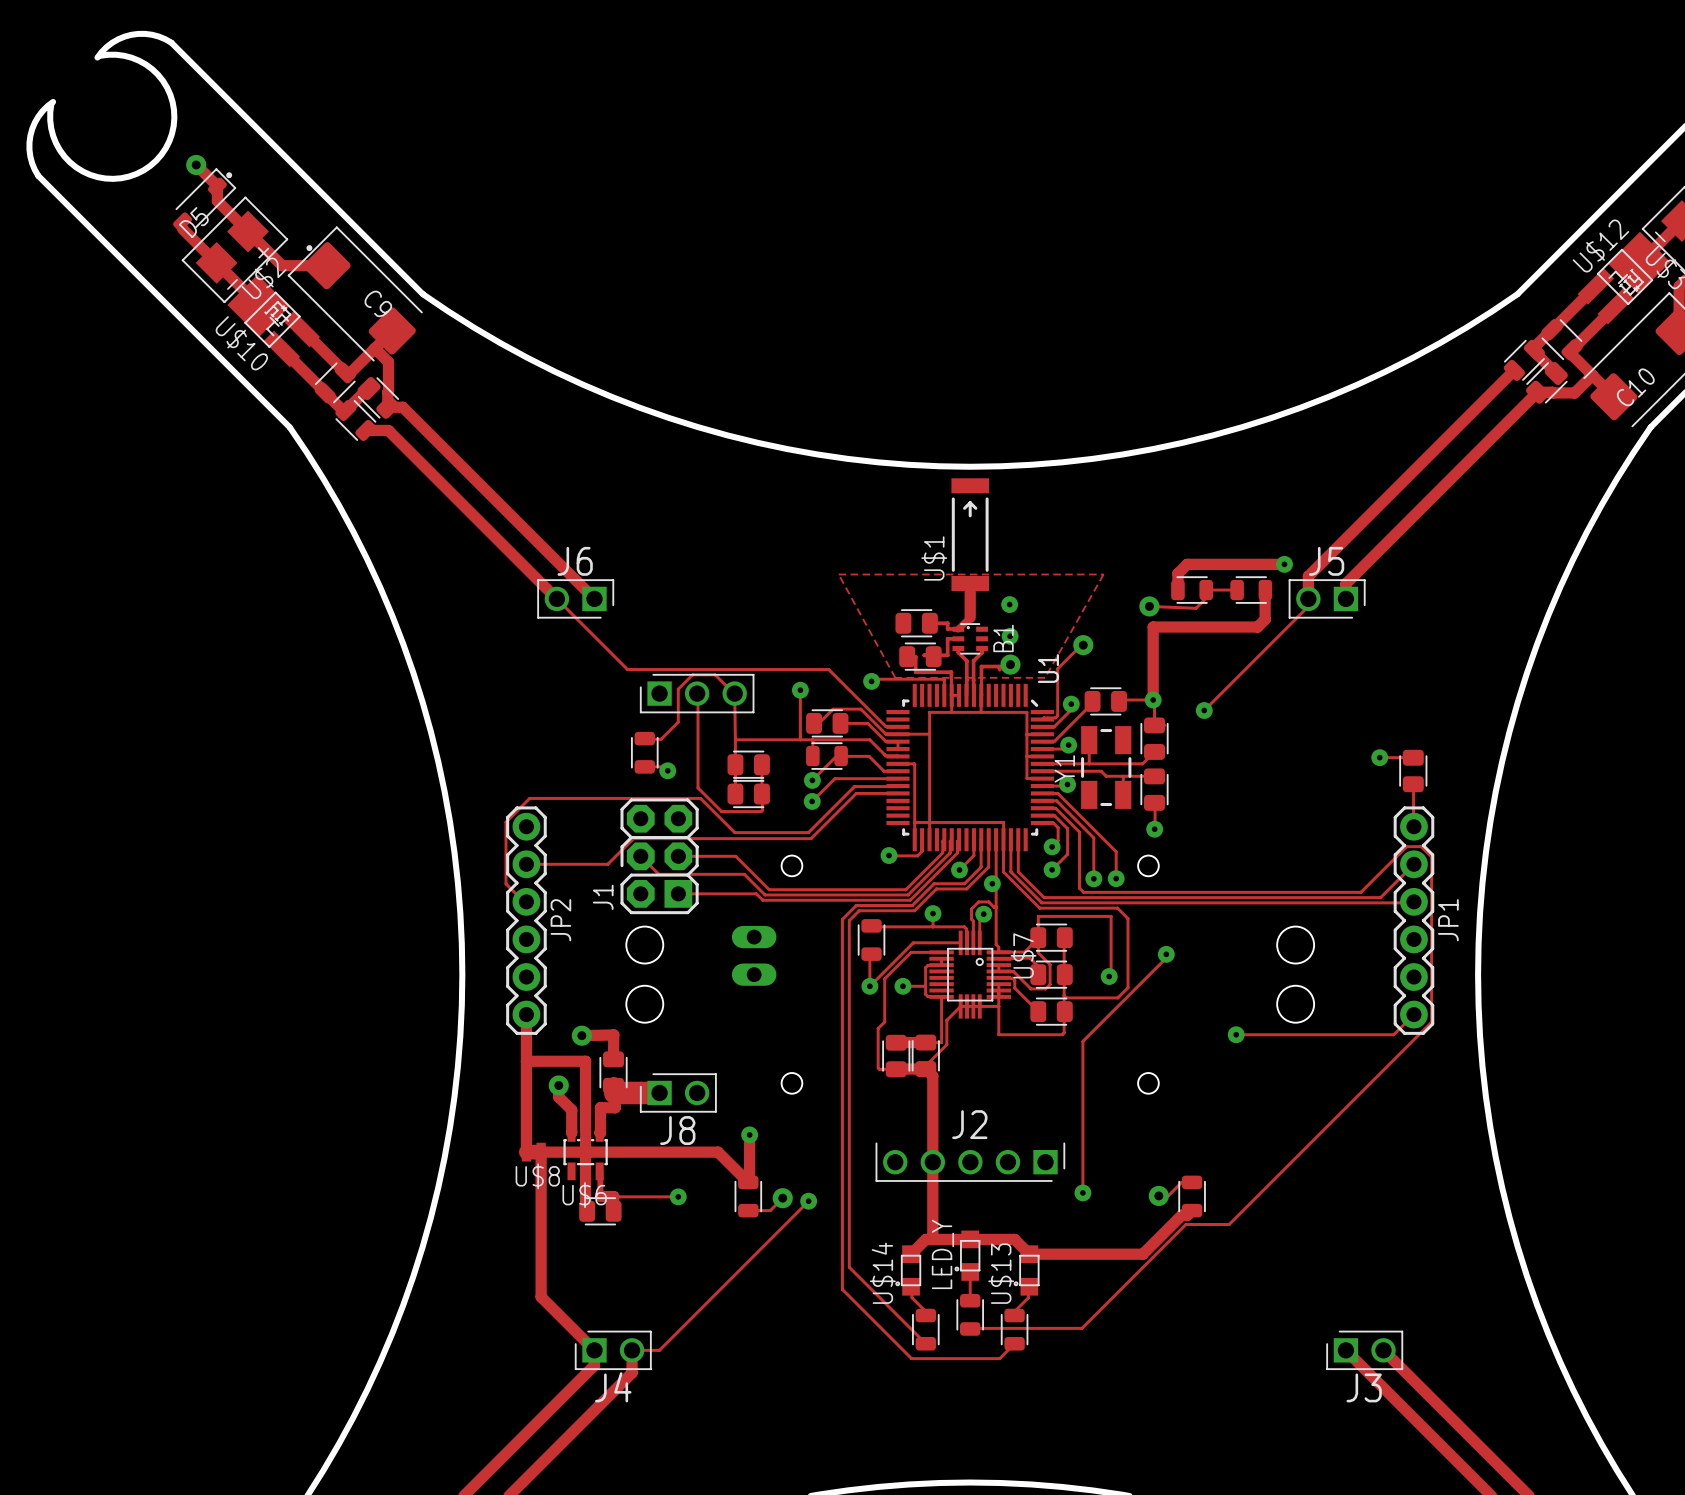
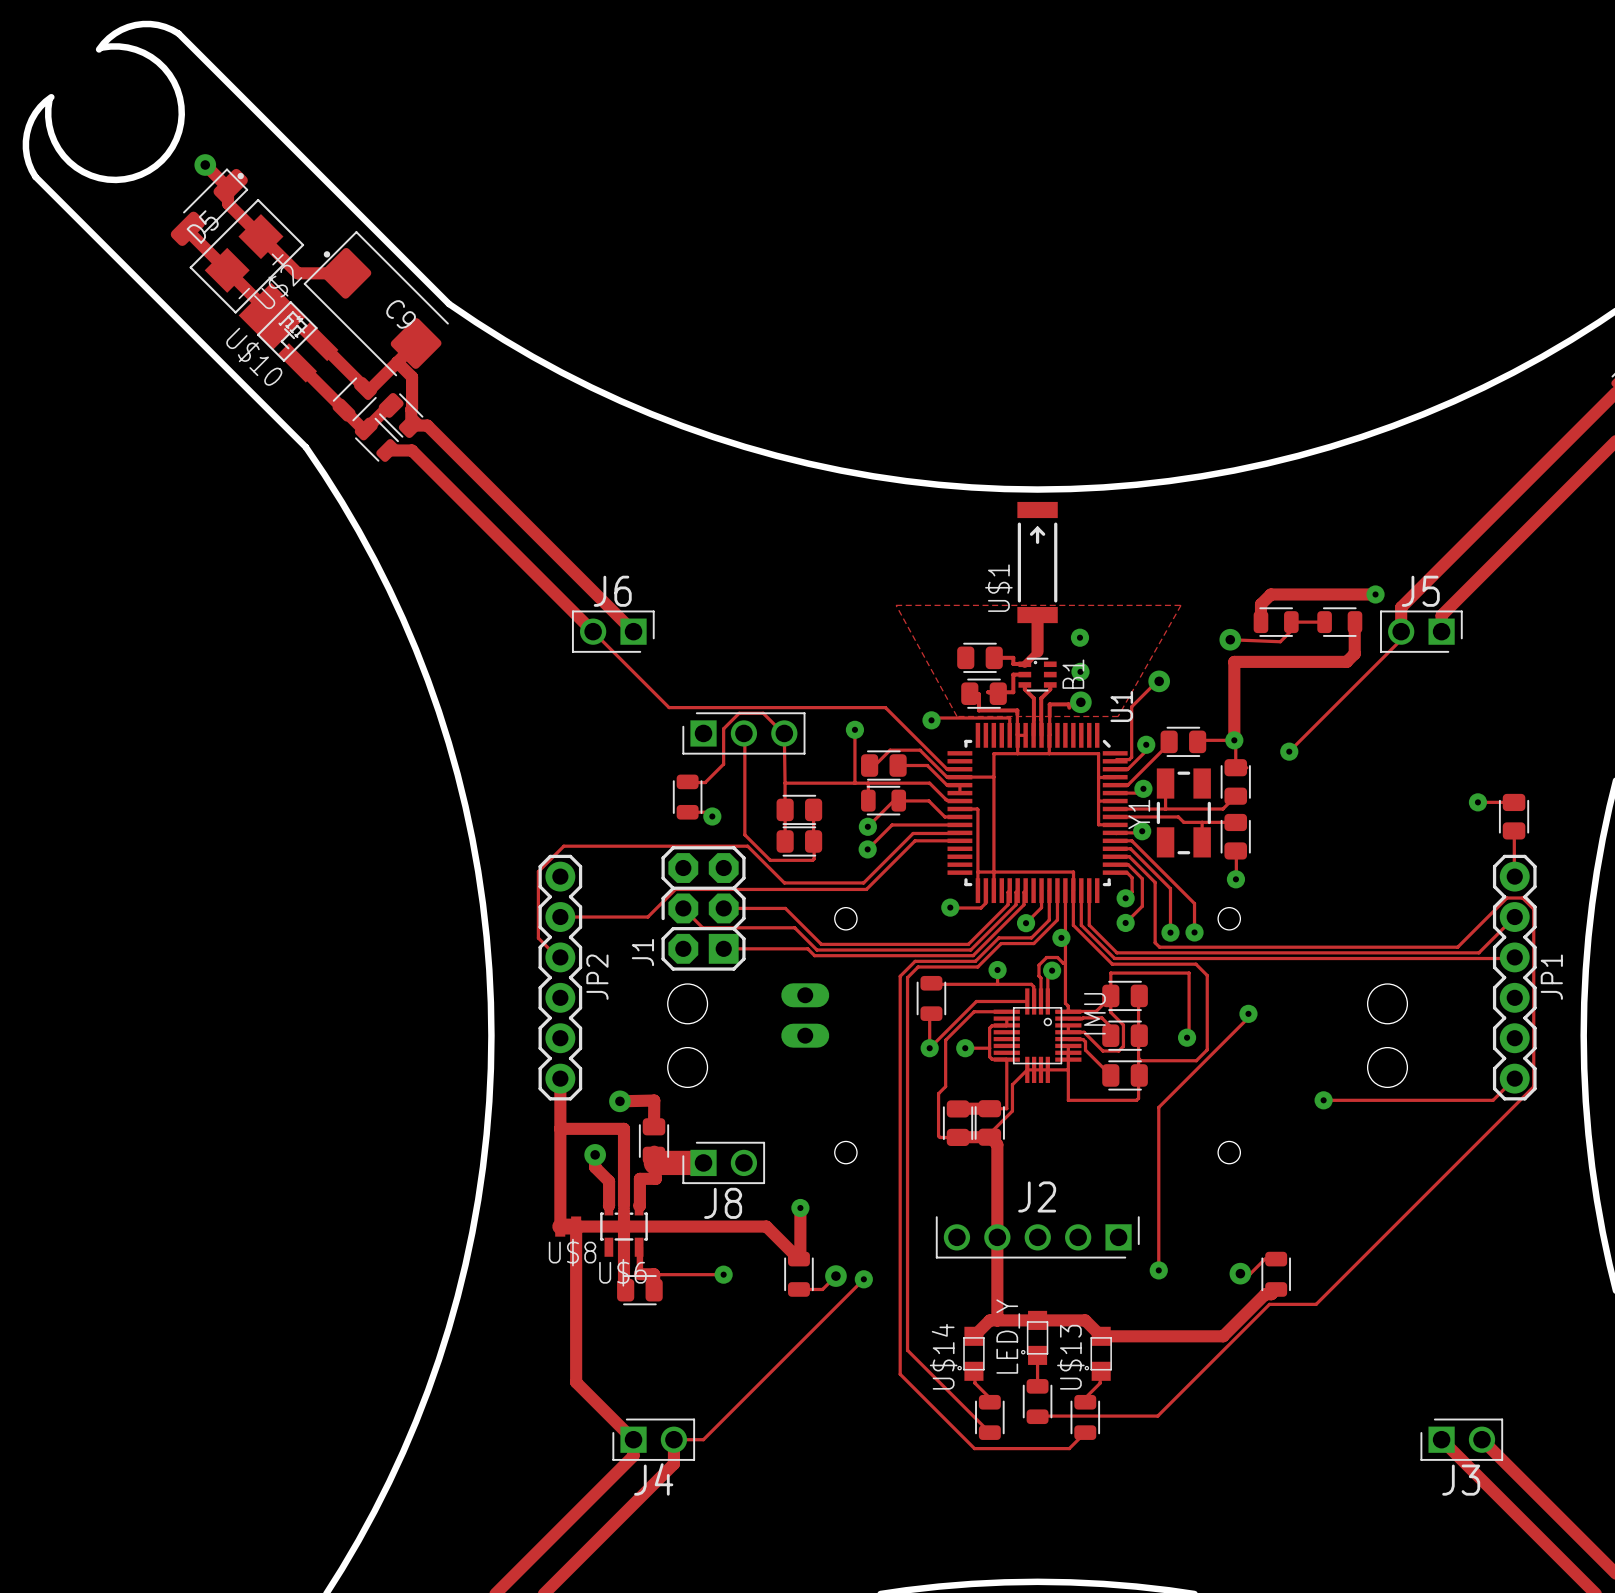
D5 footprint: [173, 168, 237, 232] -> [170, 168, 249, 246]
U$7 name: U$7 (1023, 955) -> IMU (1094, 1013)

